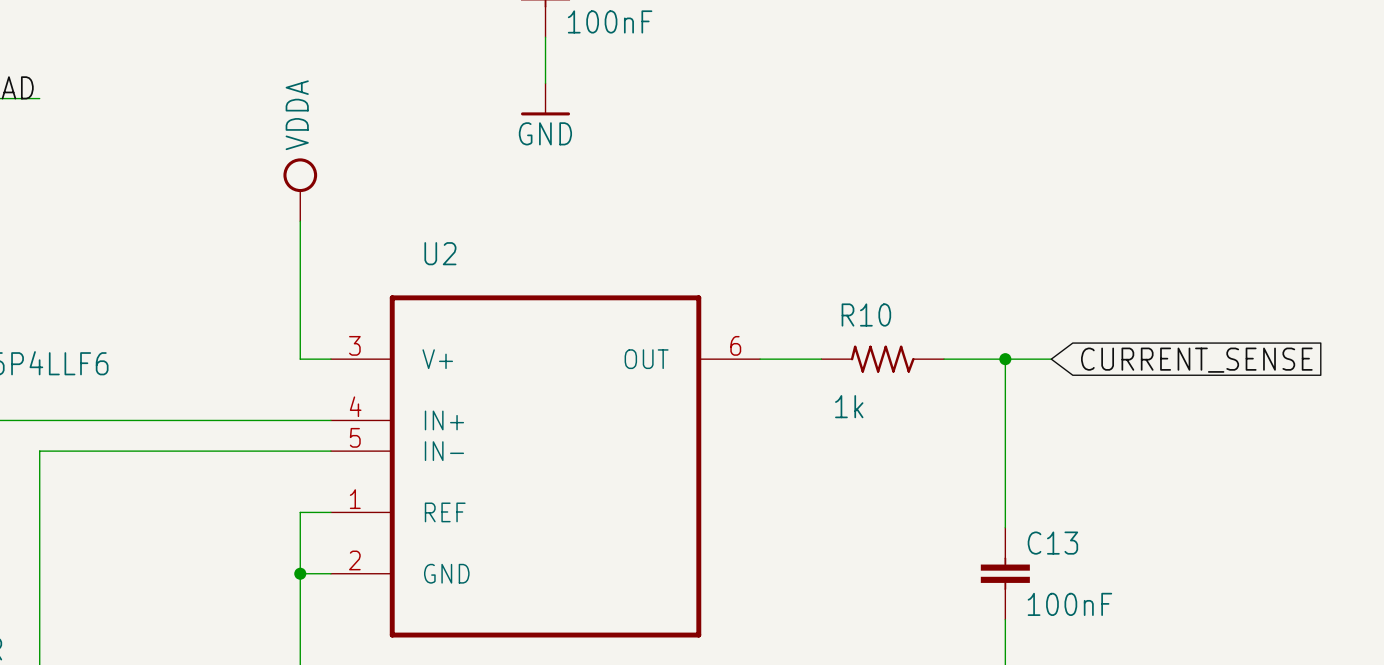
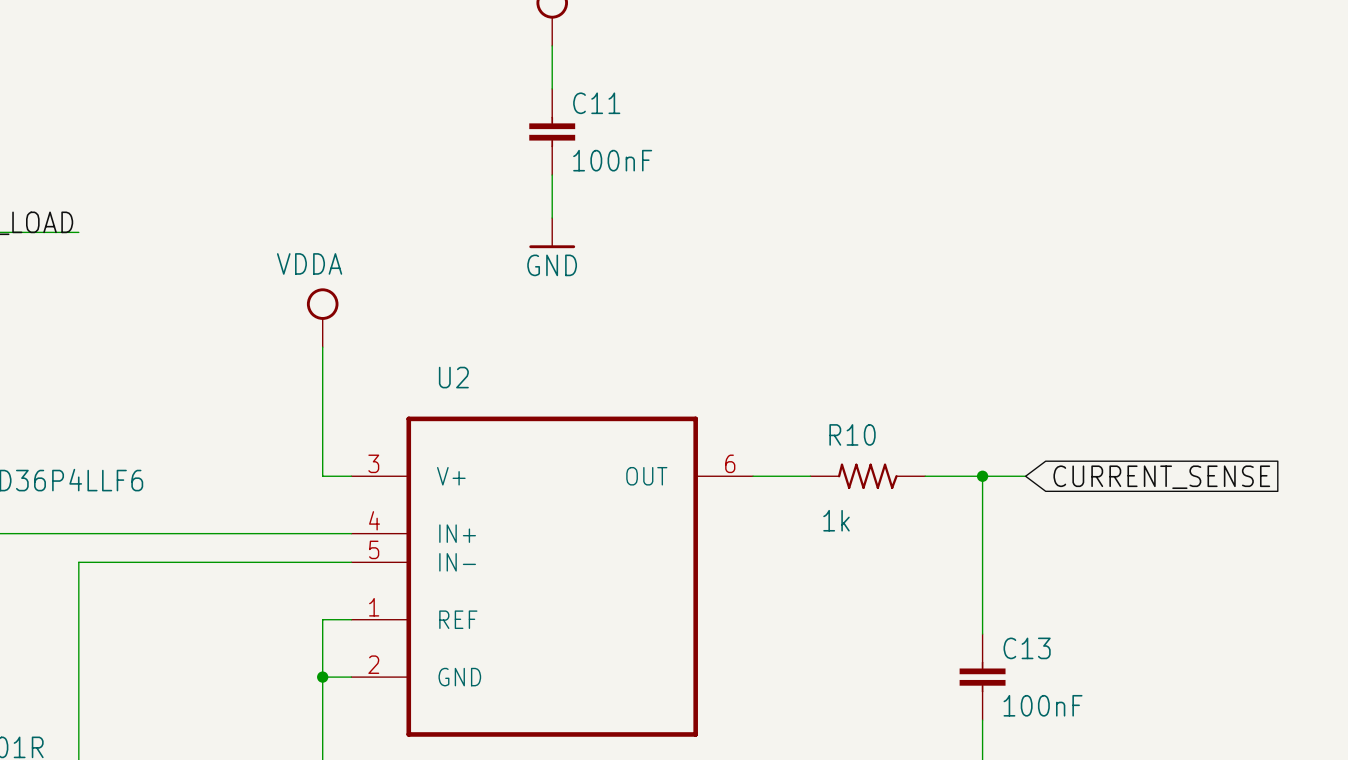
power symbol text rotation: 0° (297, 115) -> 90° clockwise (309, 263)

